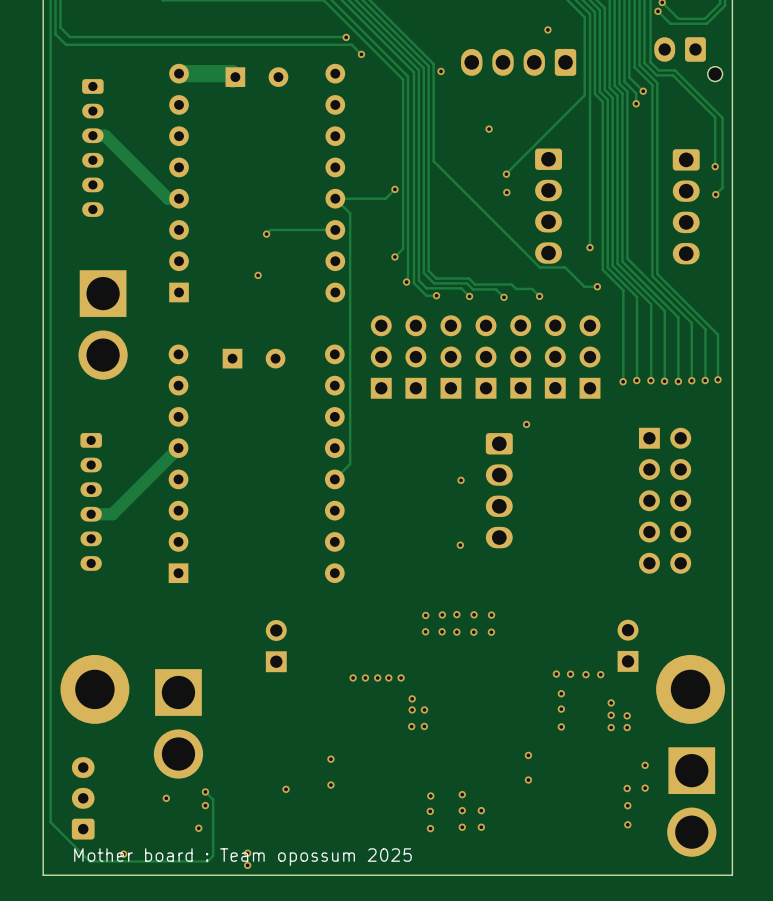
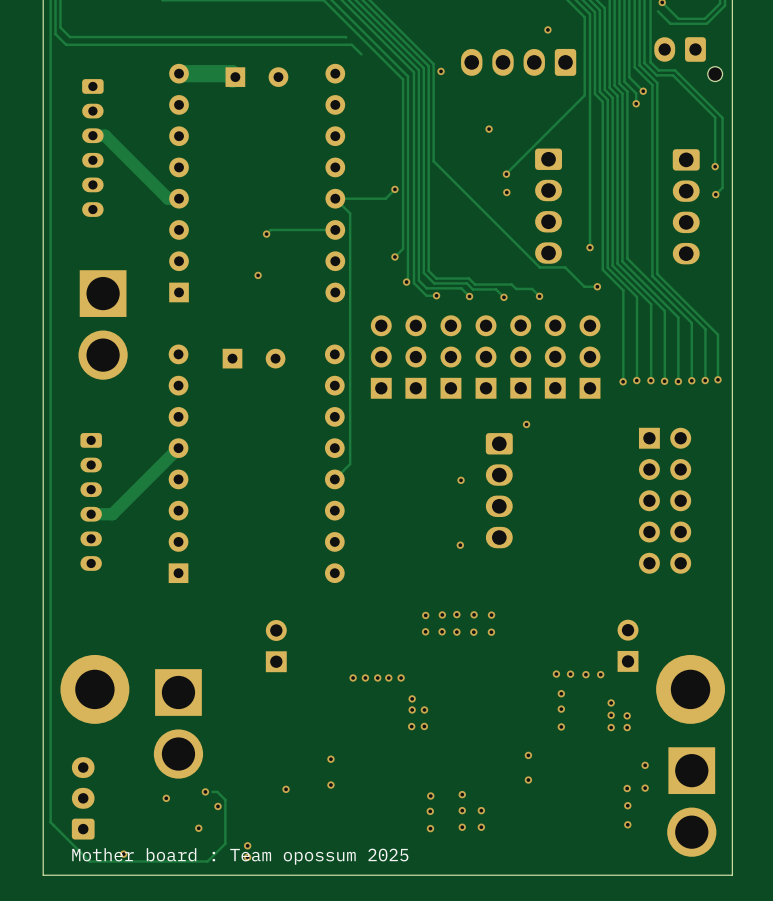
via: (657, 11) -> none
via: (346, 37) -> none
via: (361, 54) -> none
track: (205, 791) (213, 799) (213, 855) -> (212, 791) (217, 791) (225, 799) (225, 843) (213, 855)
via position: (205, 805) -> (217, 806)
via: none -> (247, 845)
via: (247, 853) -> none
via: none -> (247, 857)
via: (247, 865) -> none

